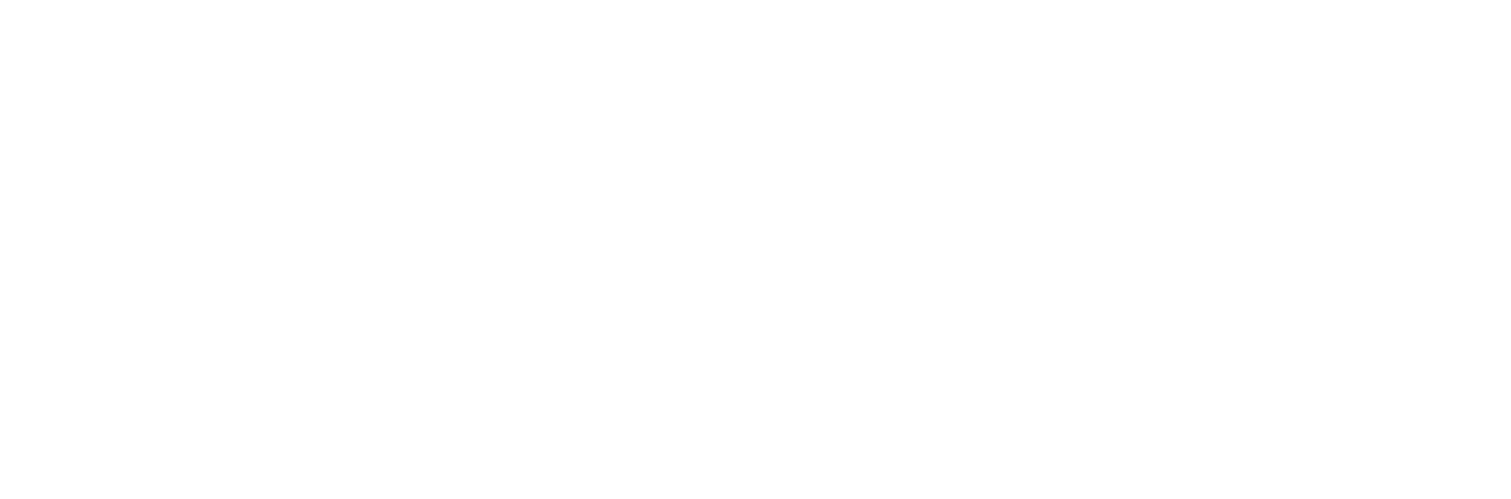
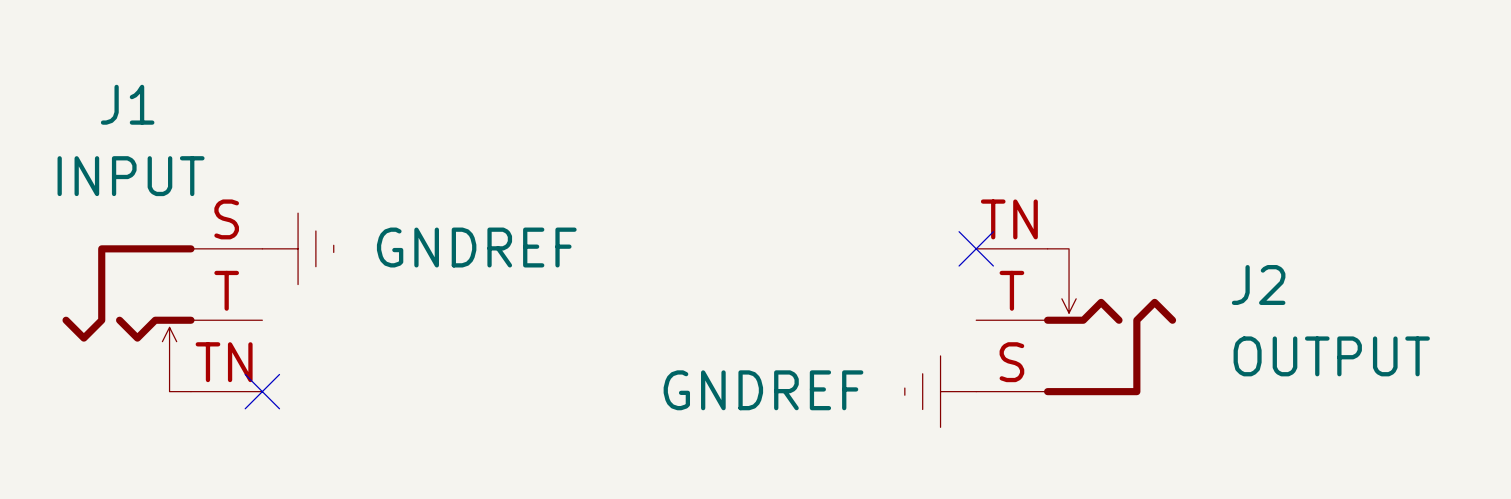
power symbol: none -> GNDREF (298, 248)
no-connect mark: none -> (976, 248)
J1: none -> INPUT (162, 318)
J2: none -> OUTPUT (1076, 322)
no-connect mark: none -> (262, 391)
power symbol: none -> GNDREF (940, 391)

